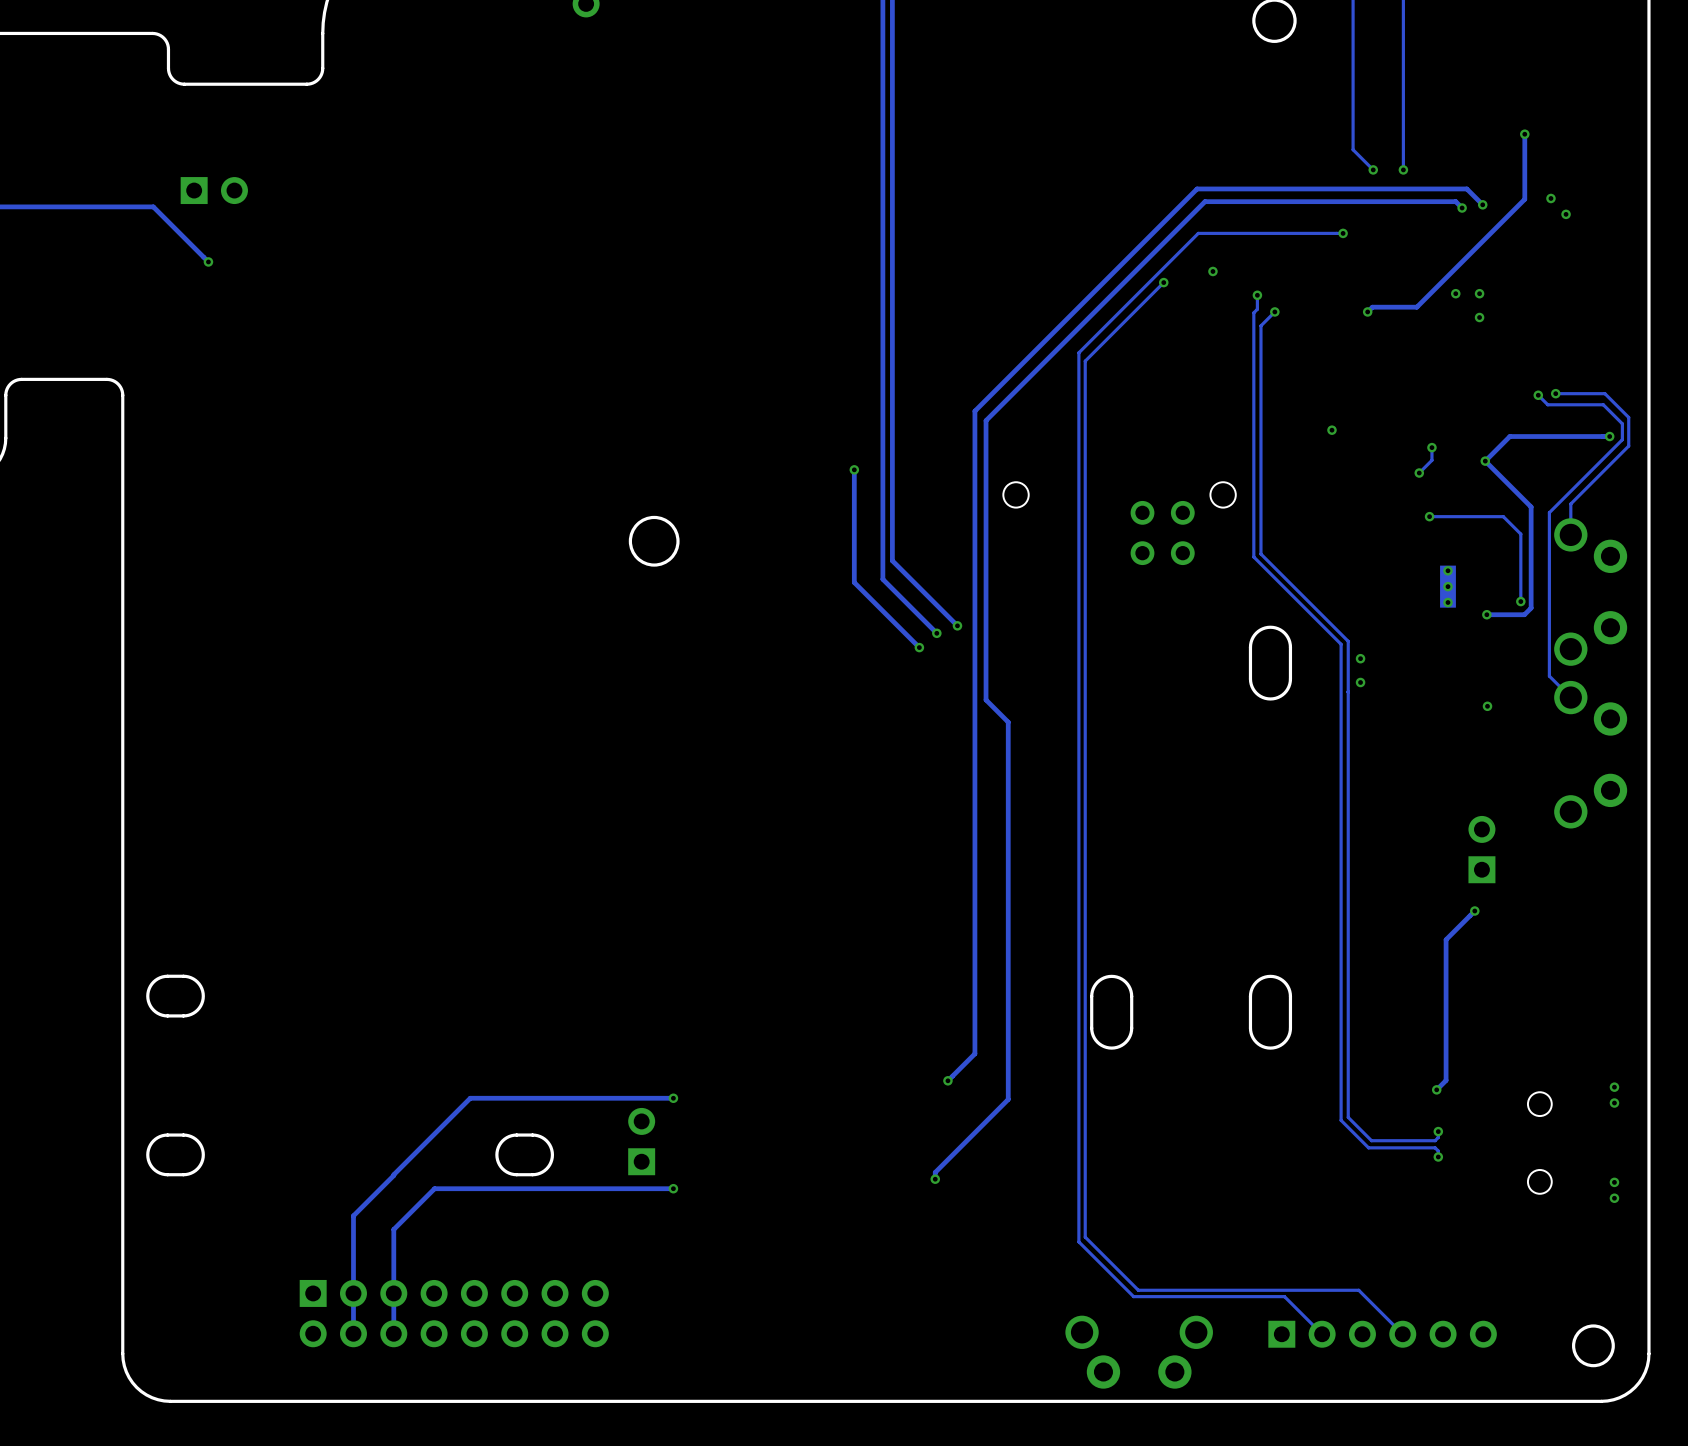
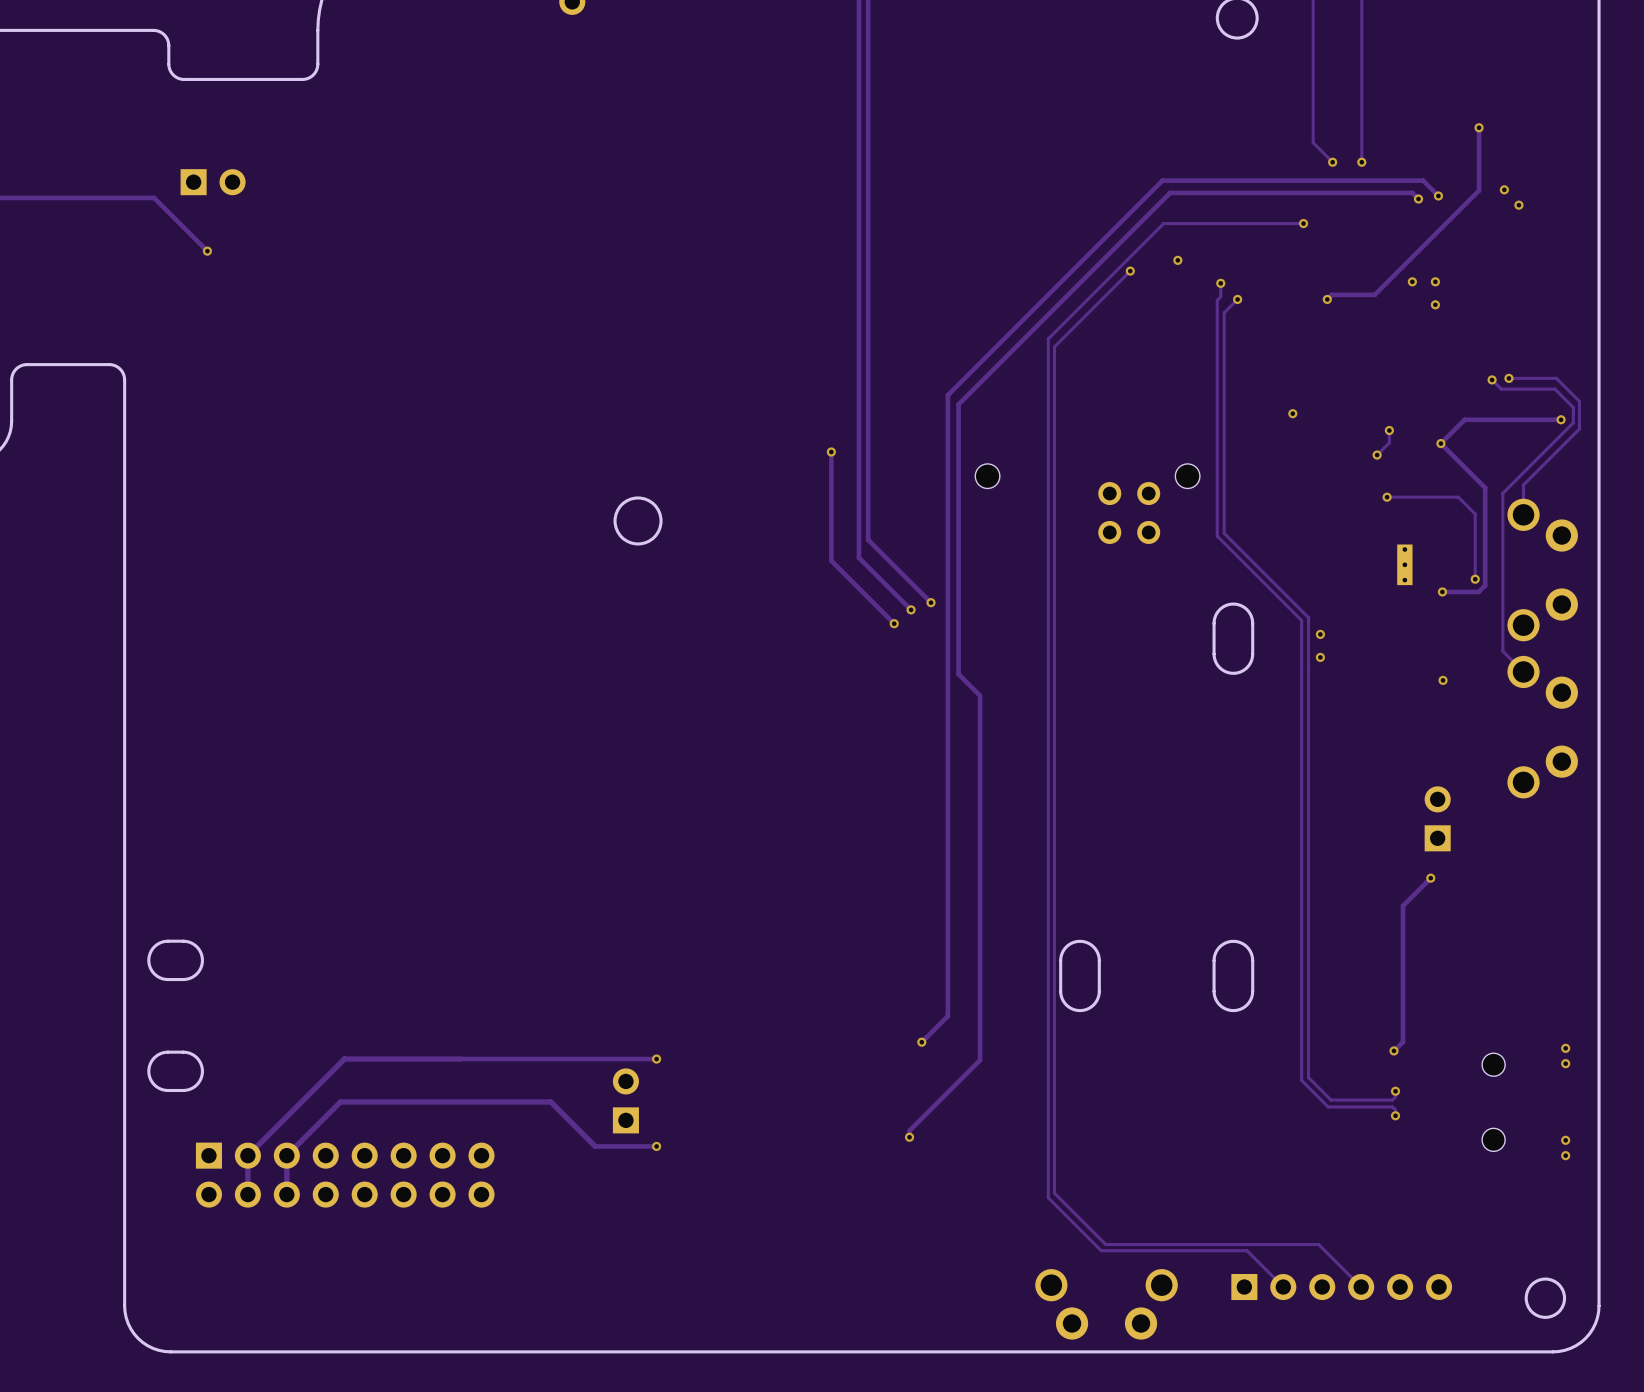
track: (470, 1098) (353, 1215) (353, 1333) -> (460, 1059) (344, 1059) (247, 1155) (247, 1194)
board edge: (183, 1135) (162, 1135) (151, 1142) (148, 1149) (147, 1157) (150, 1164) (155, 1170) (165, 1174) (186, 1174) (193, 1172) (199, 1166) (203, 1157) (201, 1147) (195, 1139) (183, 1135) -> (183, 1052) (163, 1052) (152, 1059) (148, 1073) (156, 1086) (165, 1090) (185, 1090) (198, 1082) (202, 1073) (200, 1063) (194, 1056) (183, 1052)
board edge: (532, 1135) (511, 1135) (500, 1142) (497, 1149) (497, 1157) (499, 1164) (504, 1170) (514, 1174) (535, 1174) (542, 1172) (548, 1166) (552, 1157) (550, 1147) (544, 1139) (532, 1135) -> none
track: (609, 1188) (434, 1188) (393, 1229) (393, 1333) -> (595, 1146) (550, 1101) (340, 1101) (286, 1155) (286, 1194)
part position: (454, 1313) -> (345, 1175)

